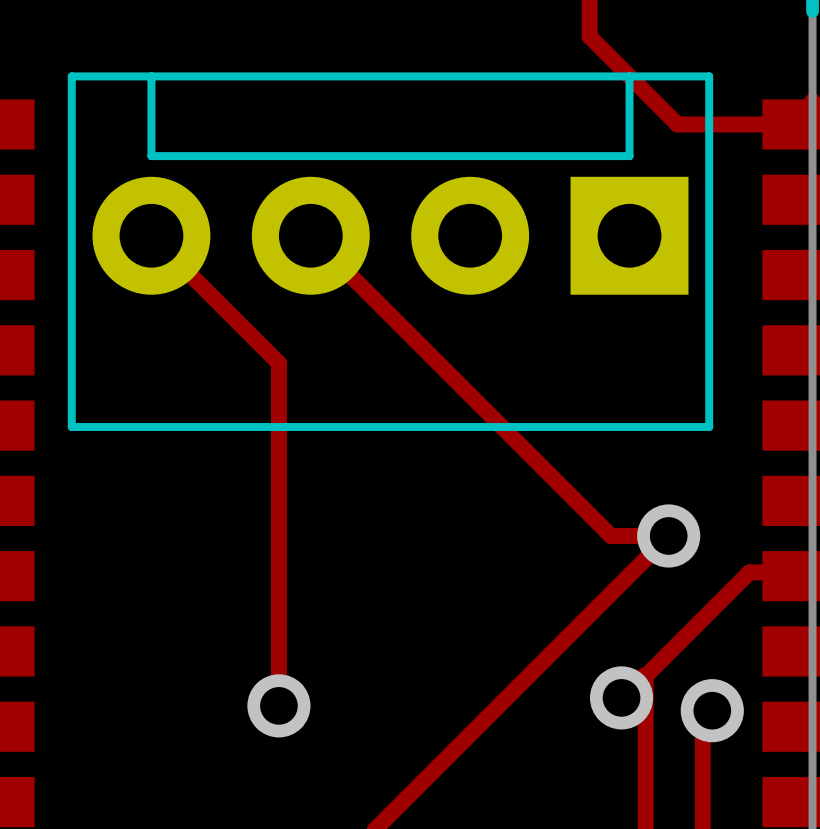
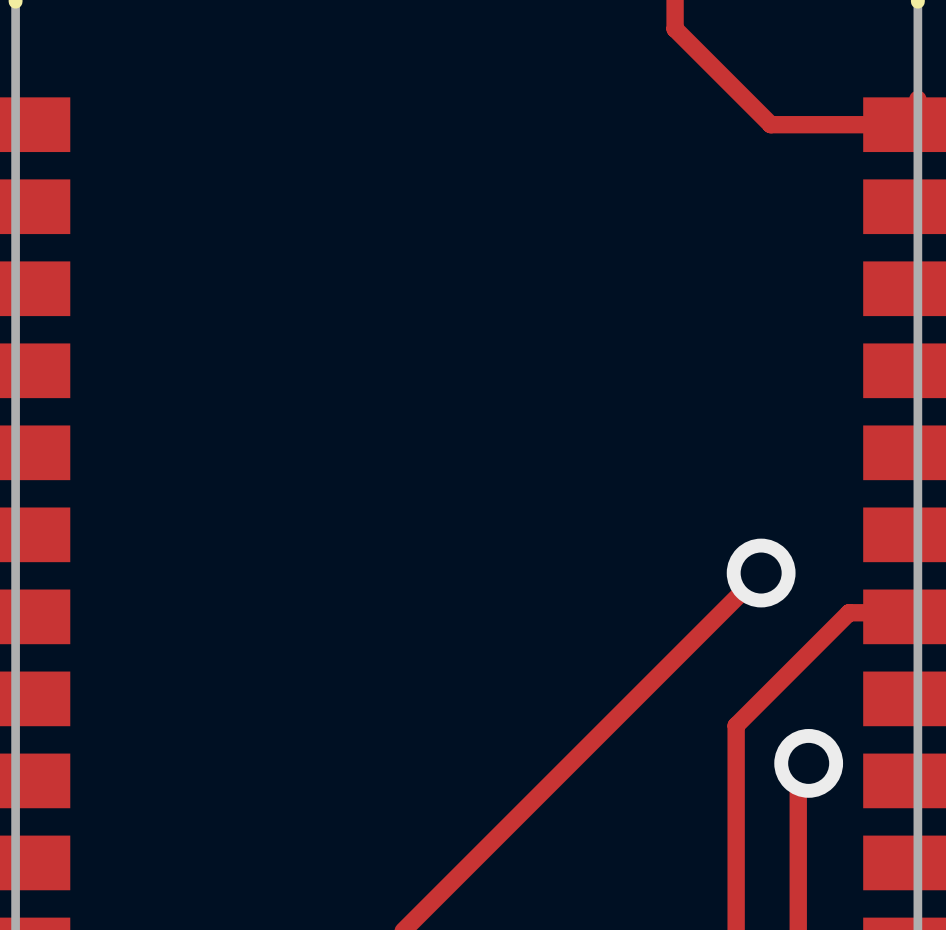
track: (151, 235) (278, 363) (278, 705) -> none
track: (310, 235) (611, 535) (668, 535) -> none
part: (390, 251) -> none
via: (621, 697) -> none
via: (278, 705) -> none

